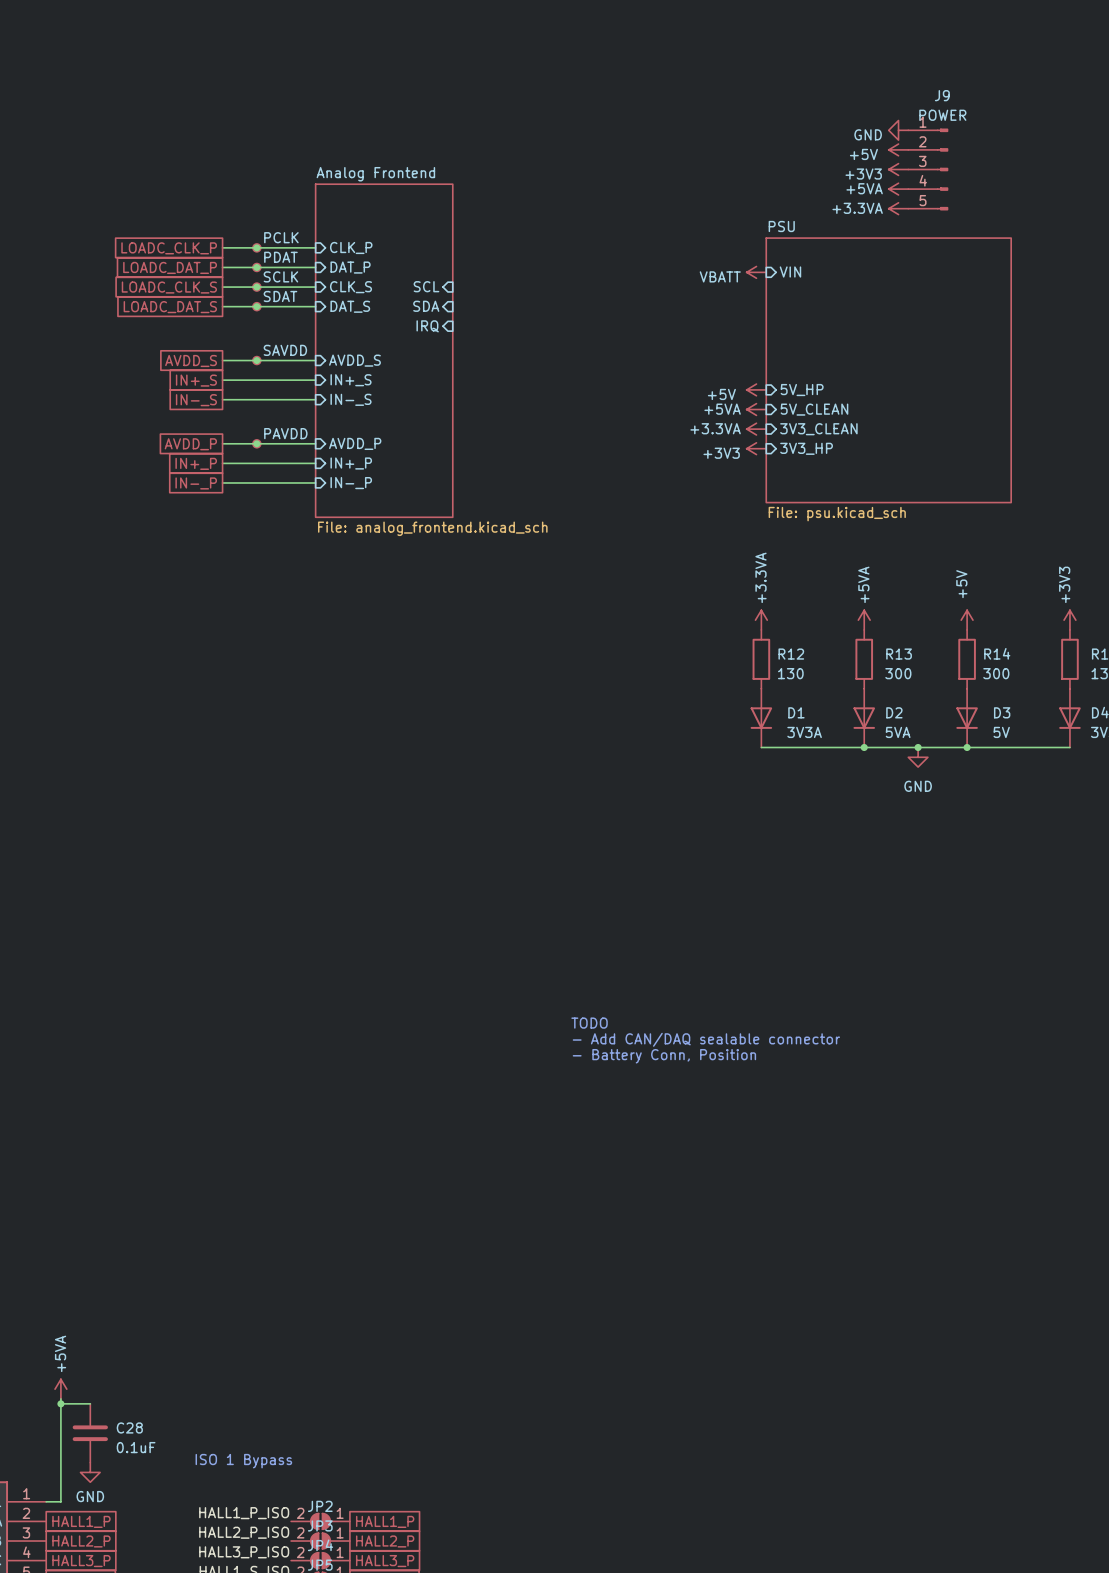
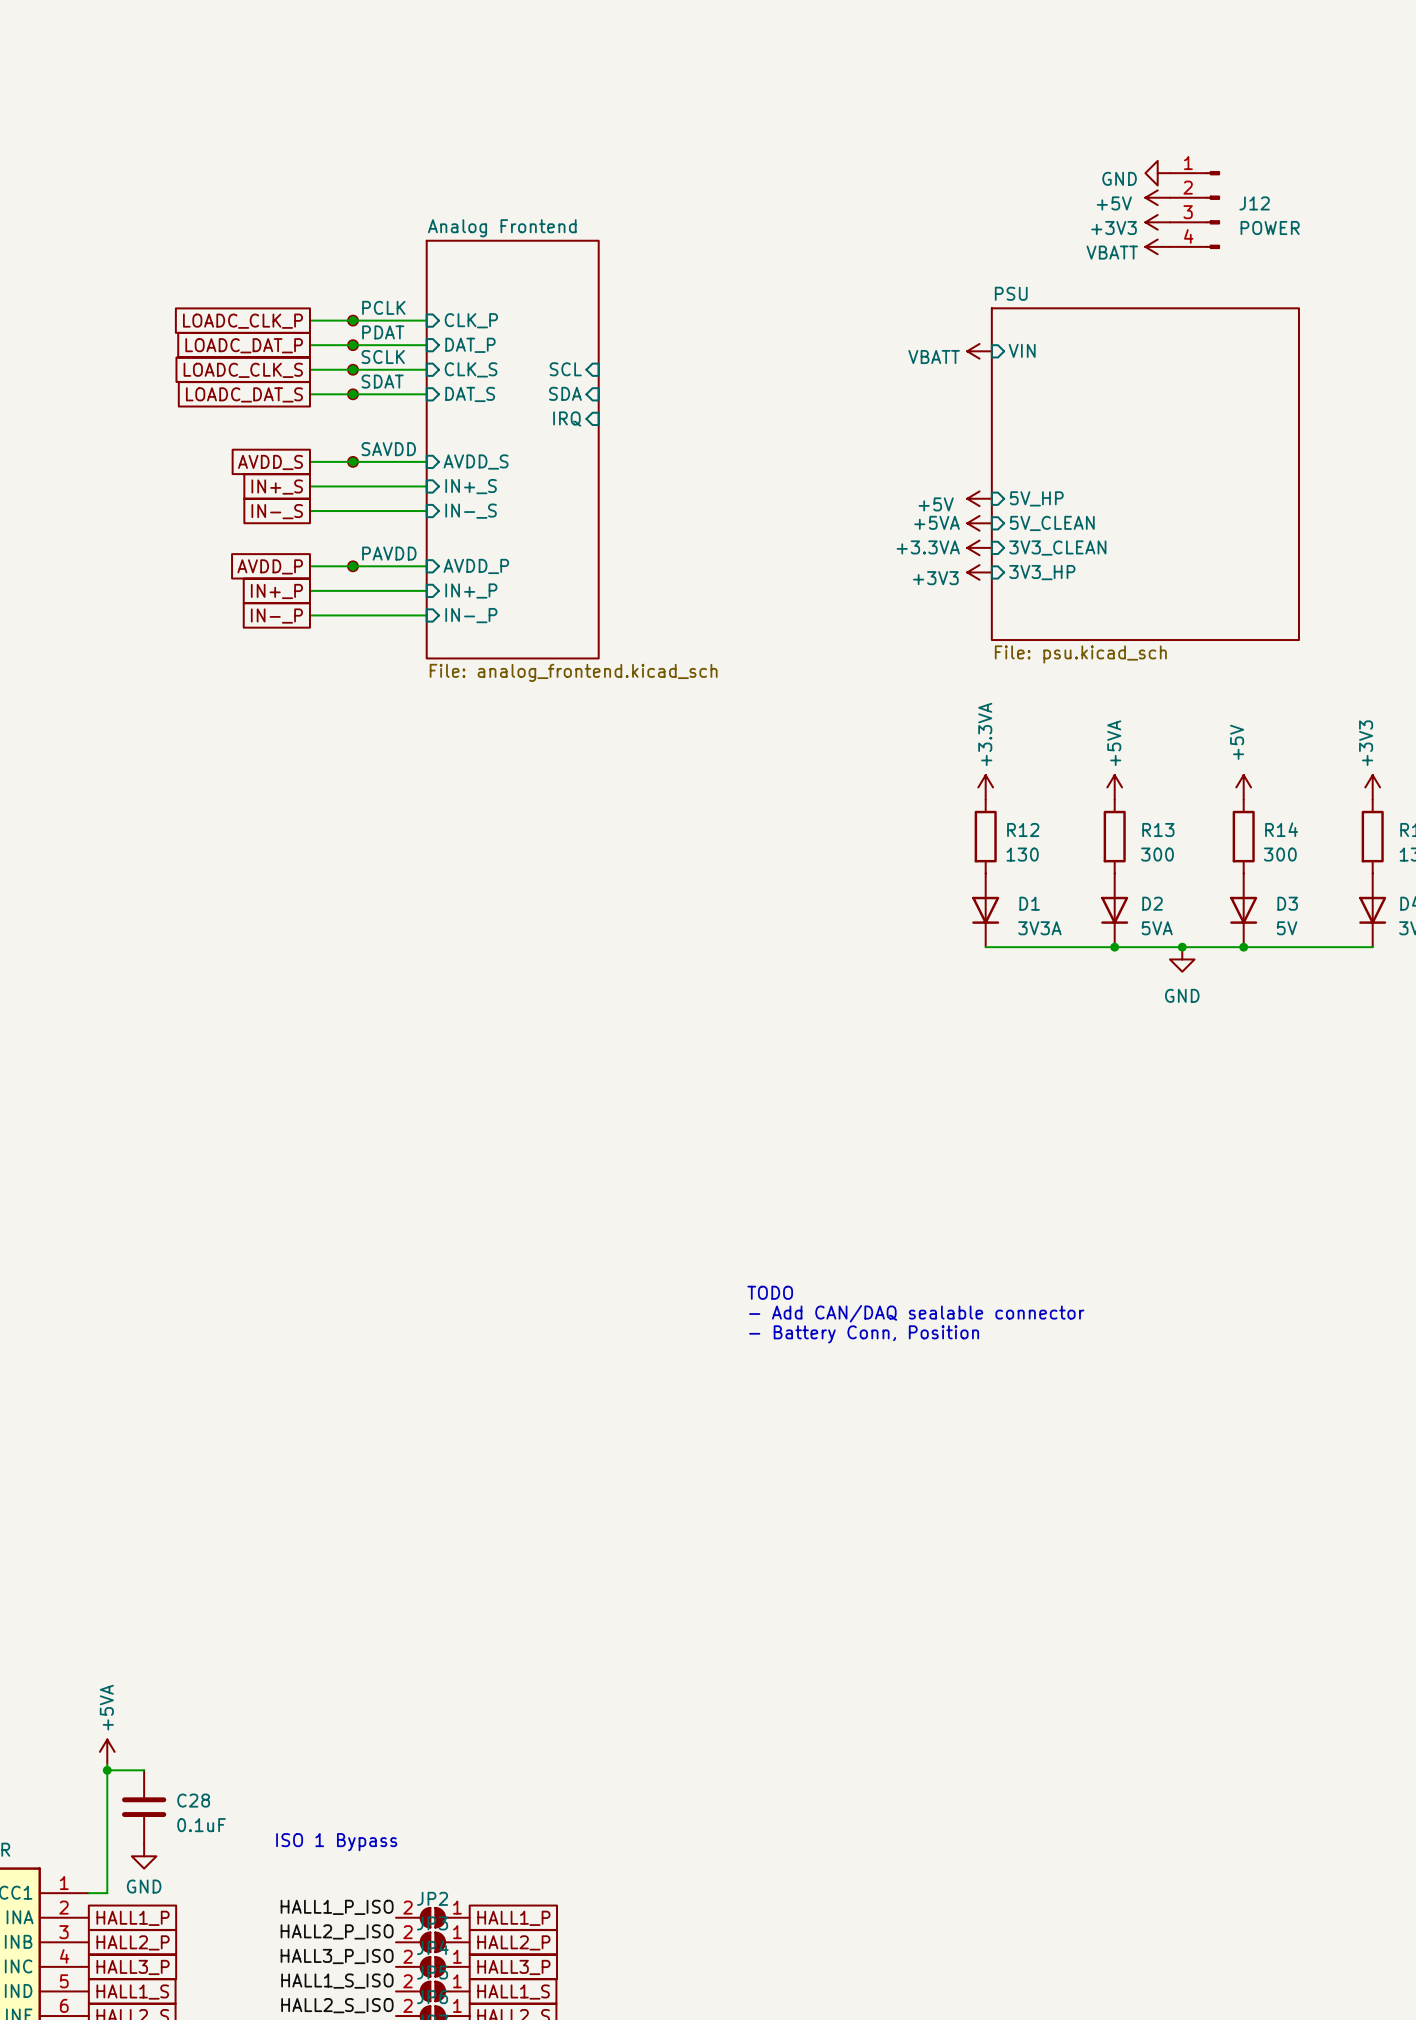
J12: none -> POWER (1194, 210)
J9: POWER (928, 169) -> none
power symbol: +5VA (898, 189) -> VBATT (1157, 246)
power symbol: +3.3VA (898, 208) -> none

